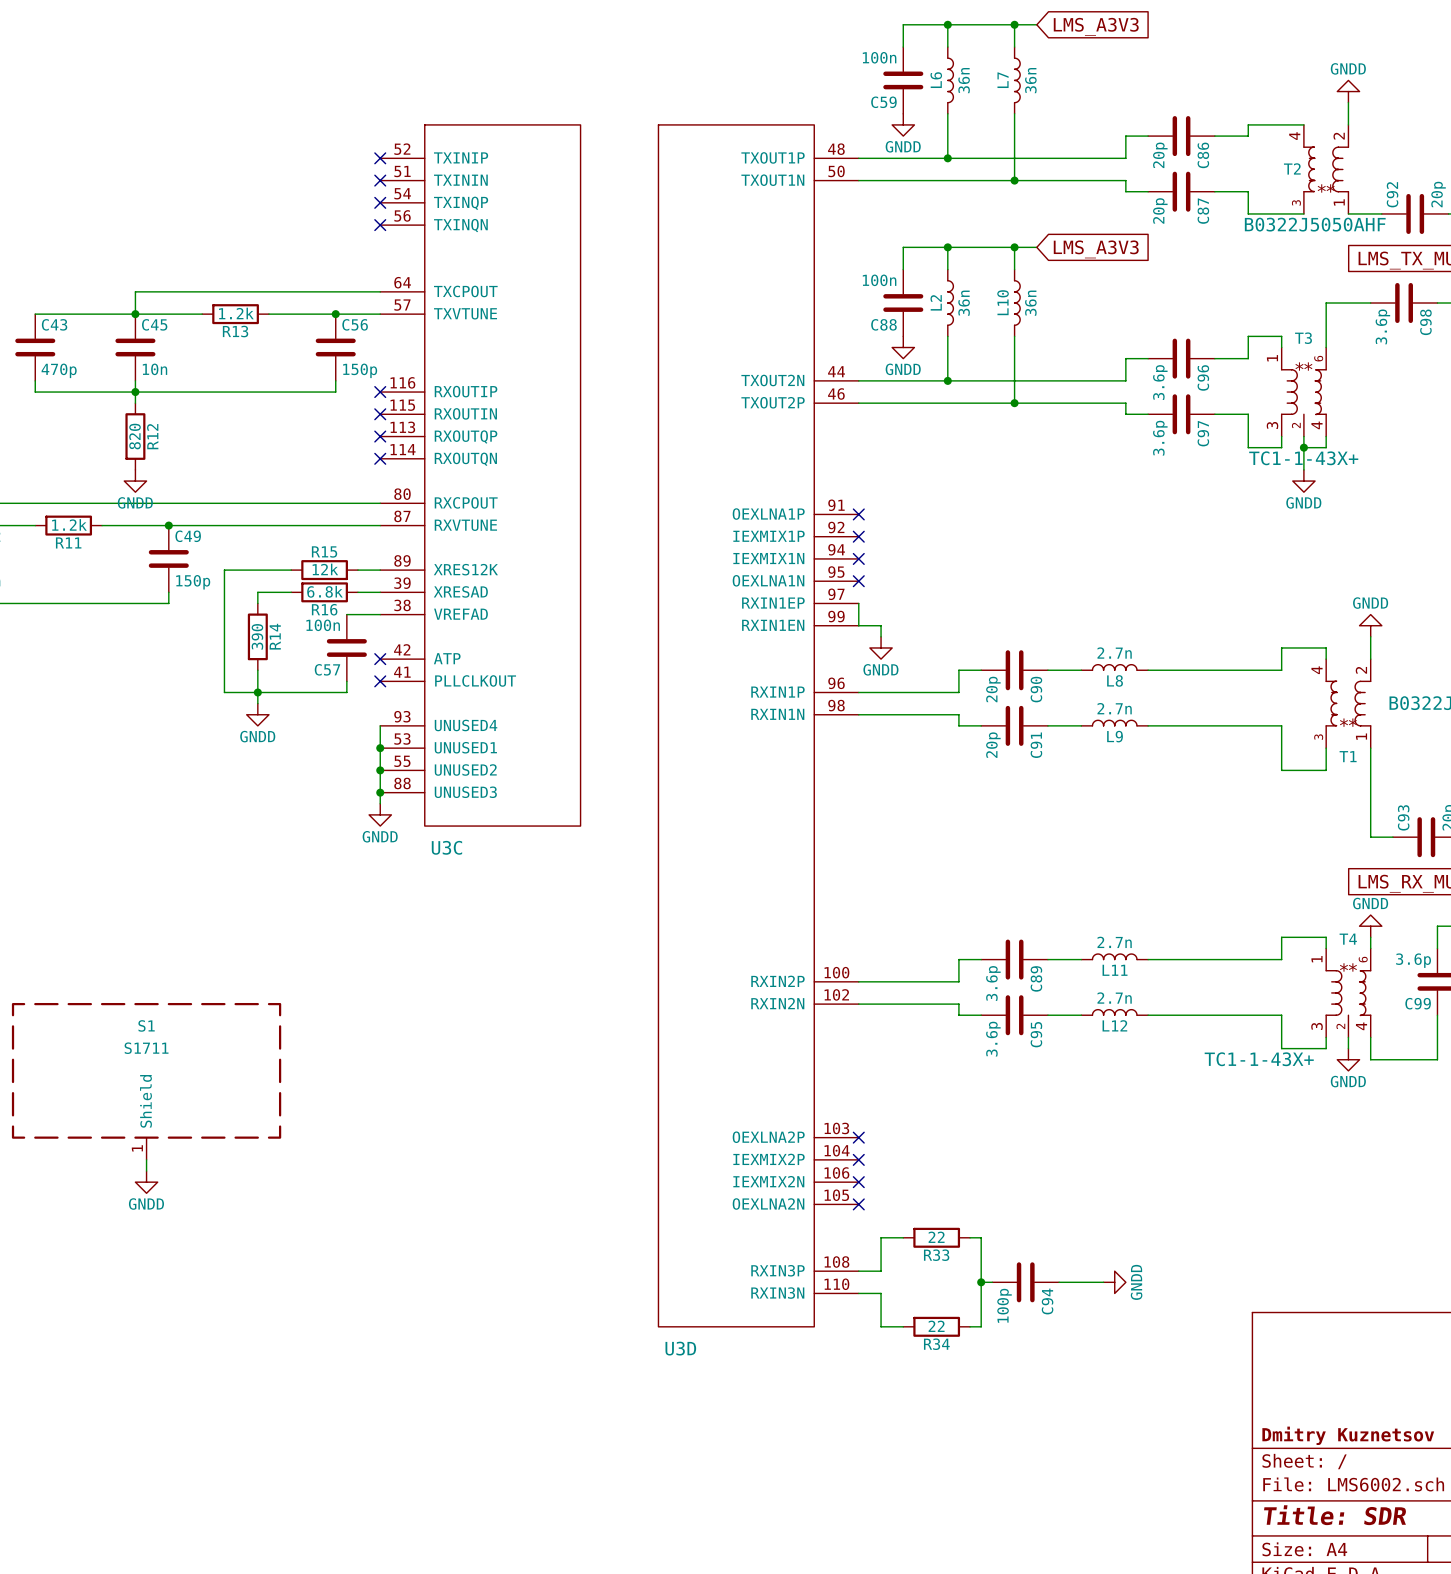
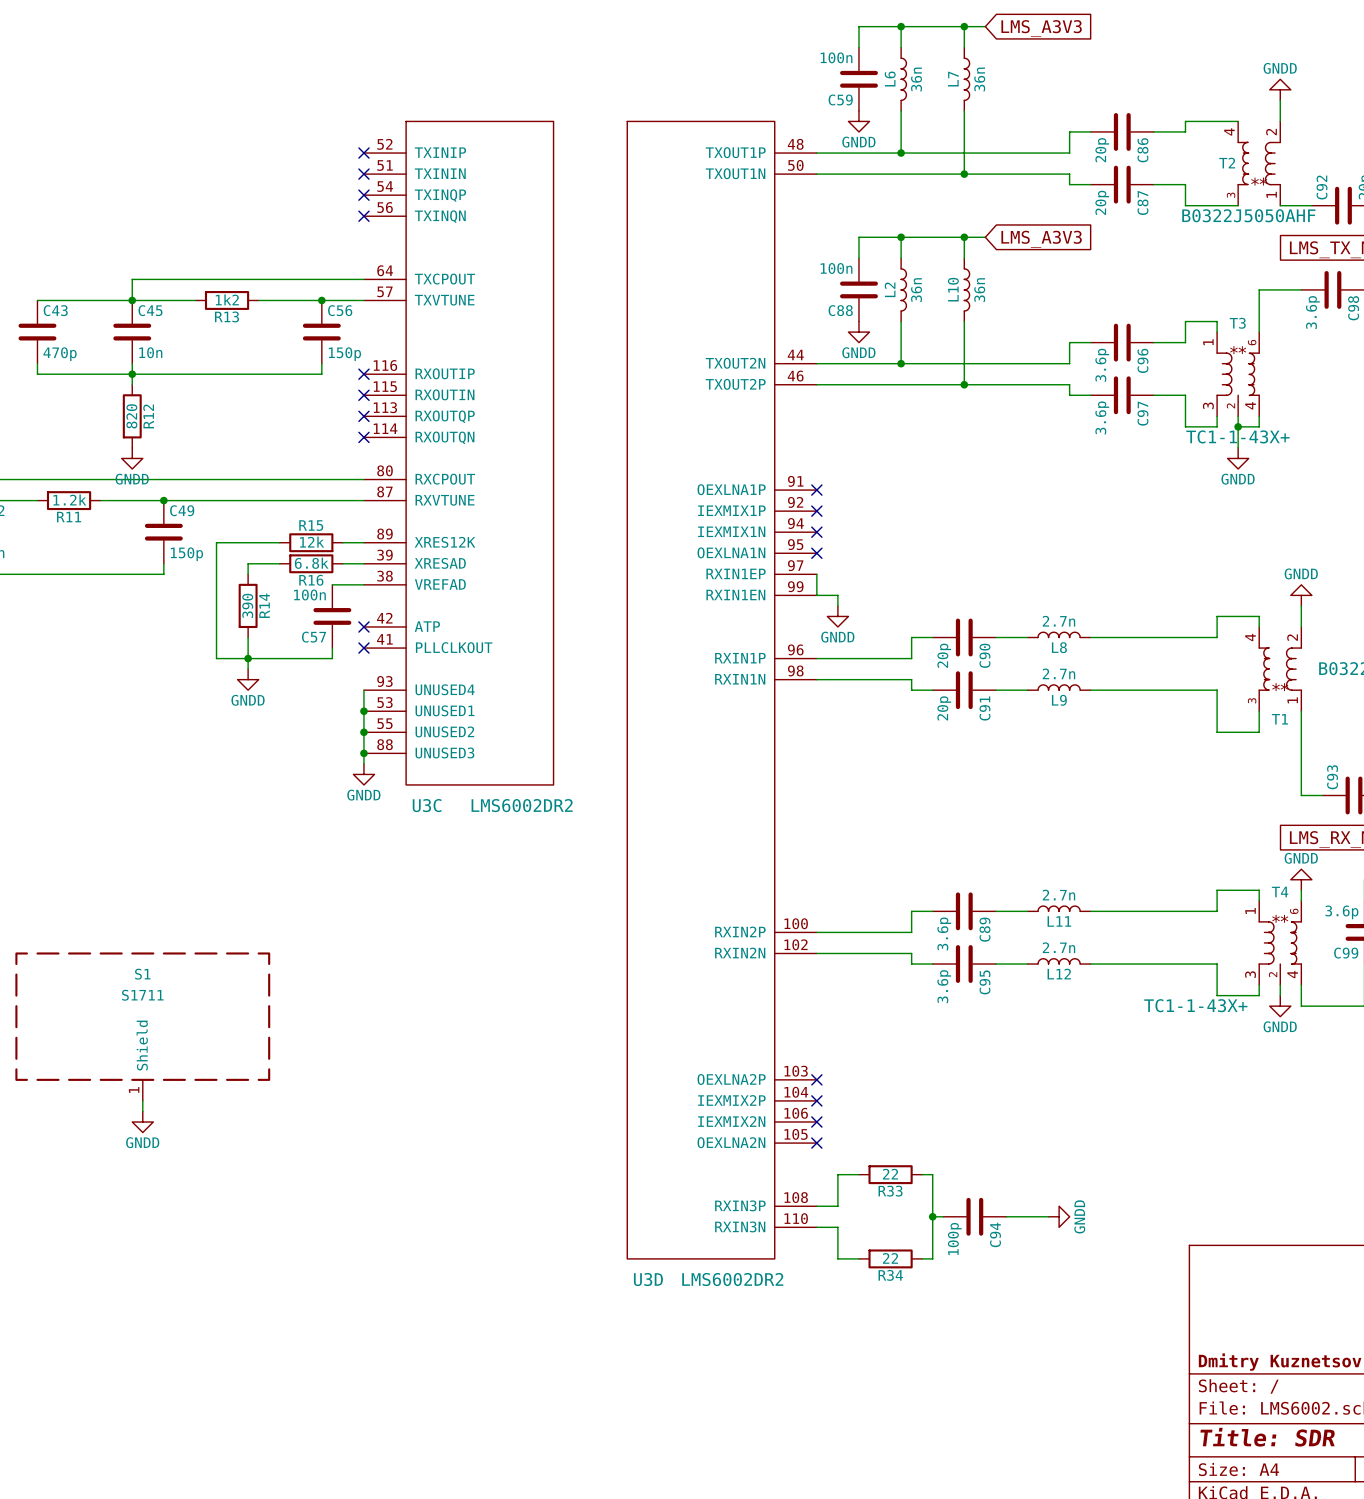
R13 value: 1.2k (236, 313) -> 1k2 (227, 299)
U3C text: none -> LMS6002DR2 (522, 805)
U3D text: none -> LMS6002DR2 (732, 1279)

